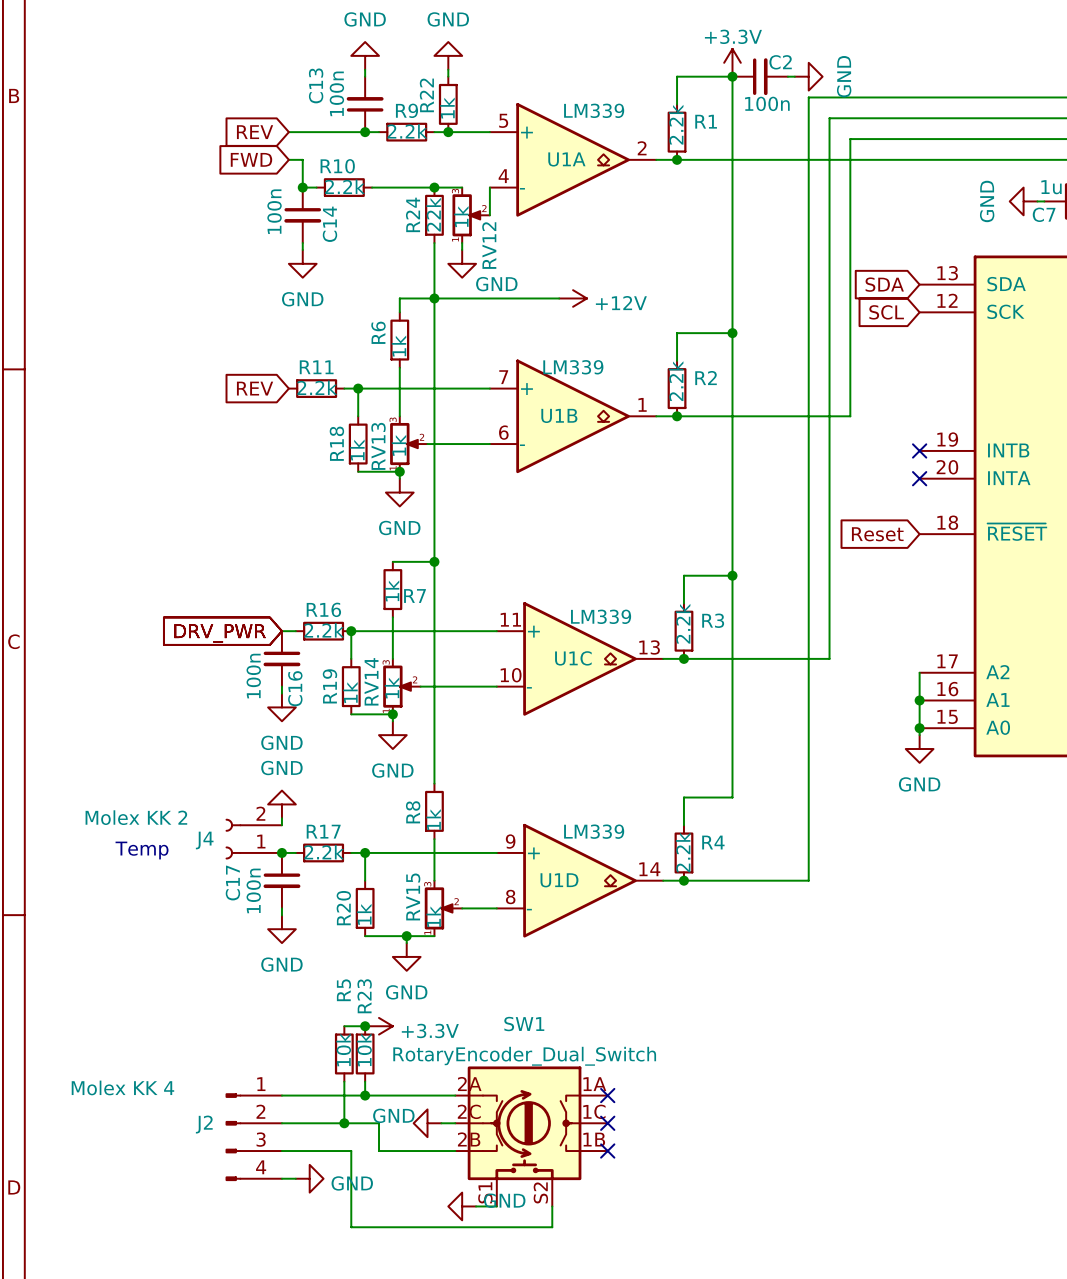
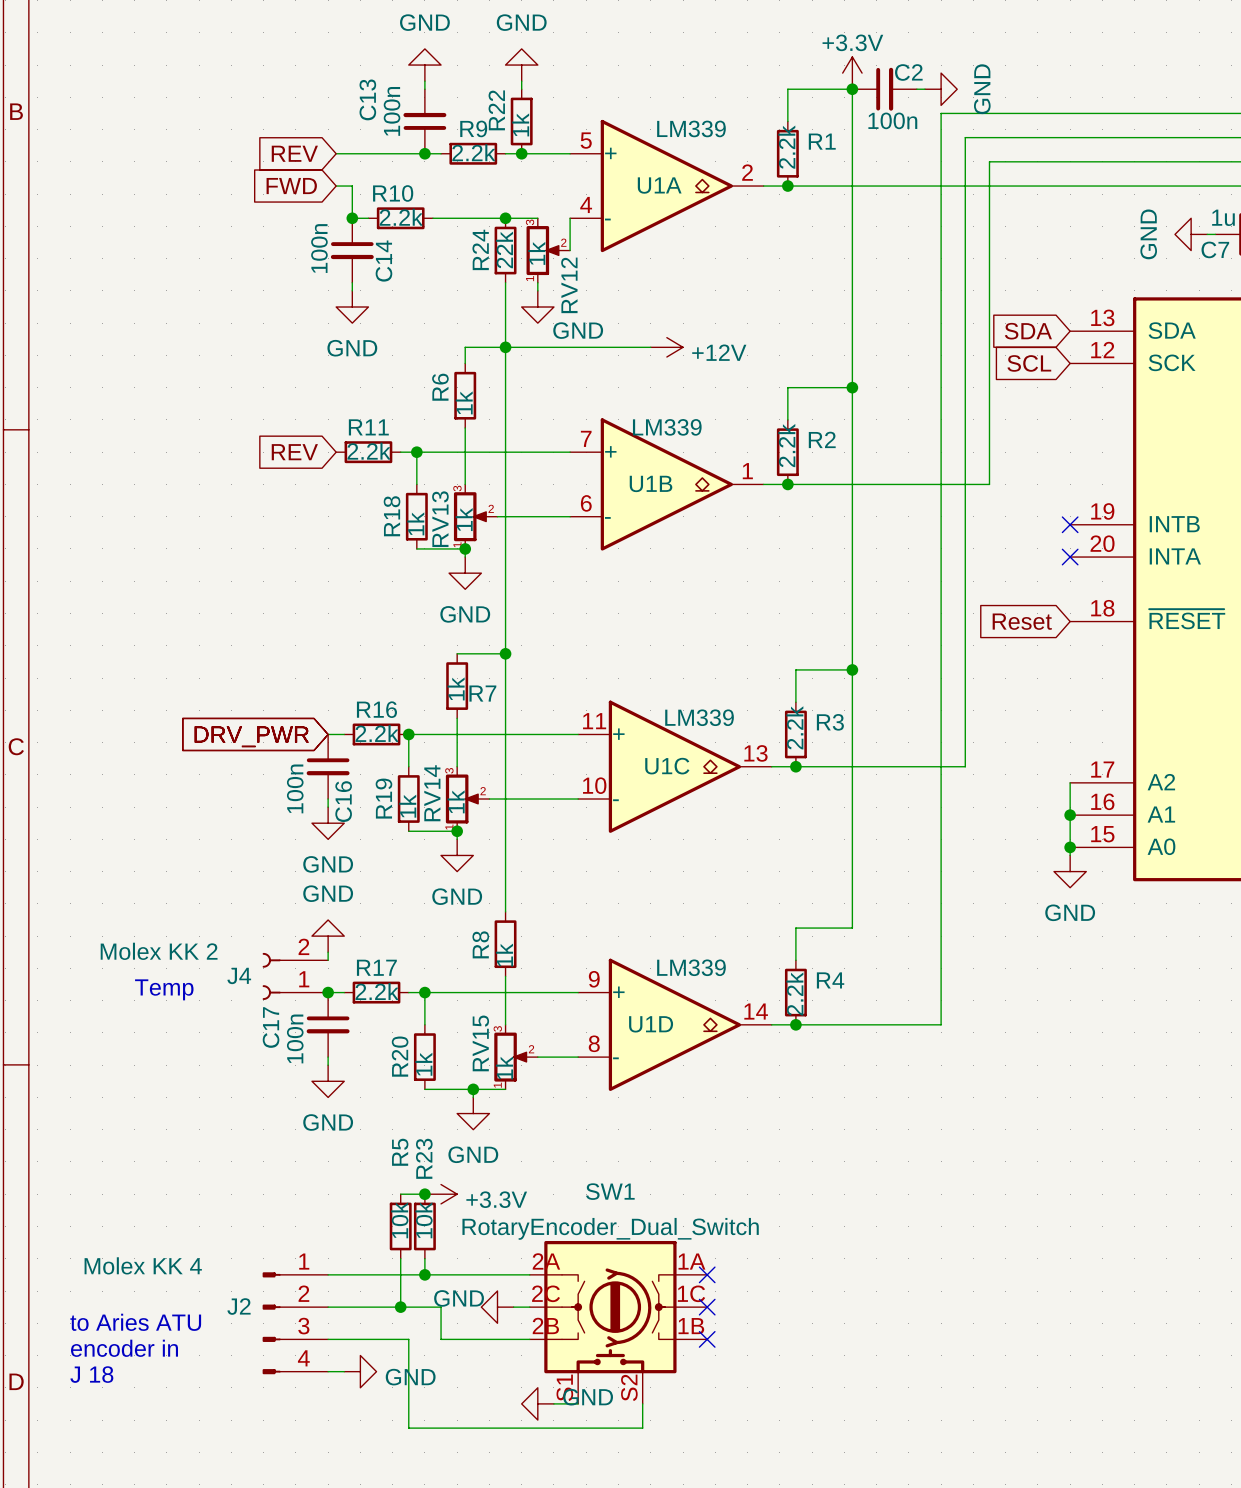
SW1 symbol: [455, 1066, 608, 1207] -> [529, 1240, 708, 1404]
text: none -> to Aries ATU (135, 1322)
text: none -> encoder in (124, 1348)
text: none -> J 18 (91, 1374)

